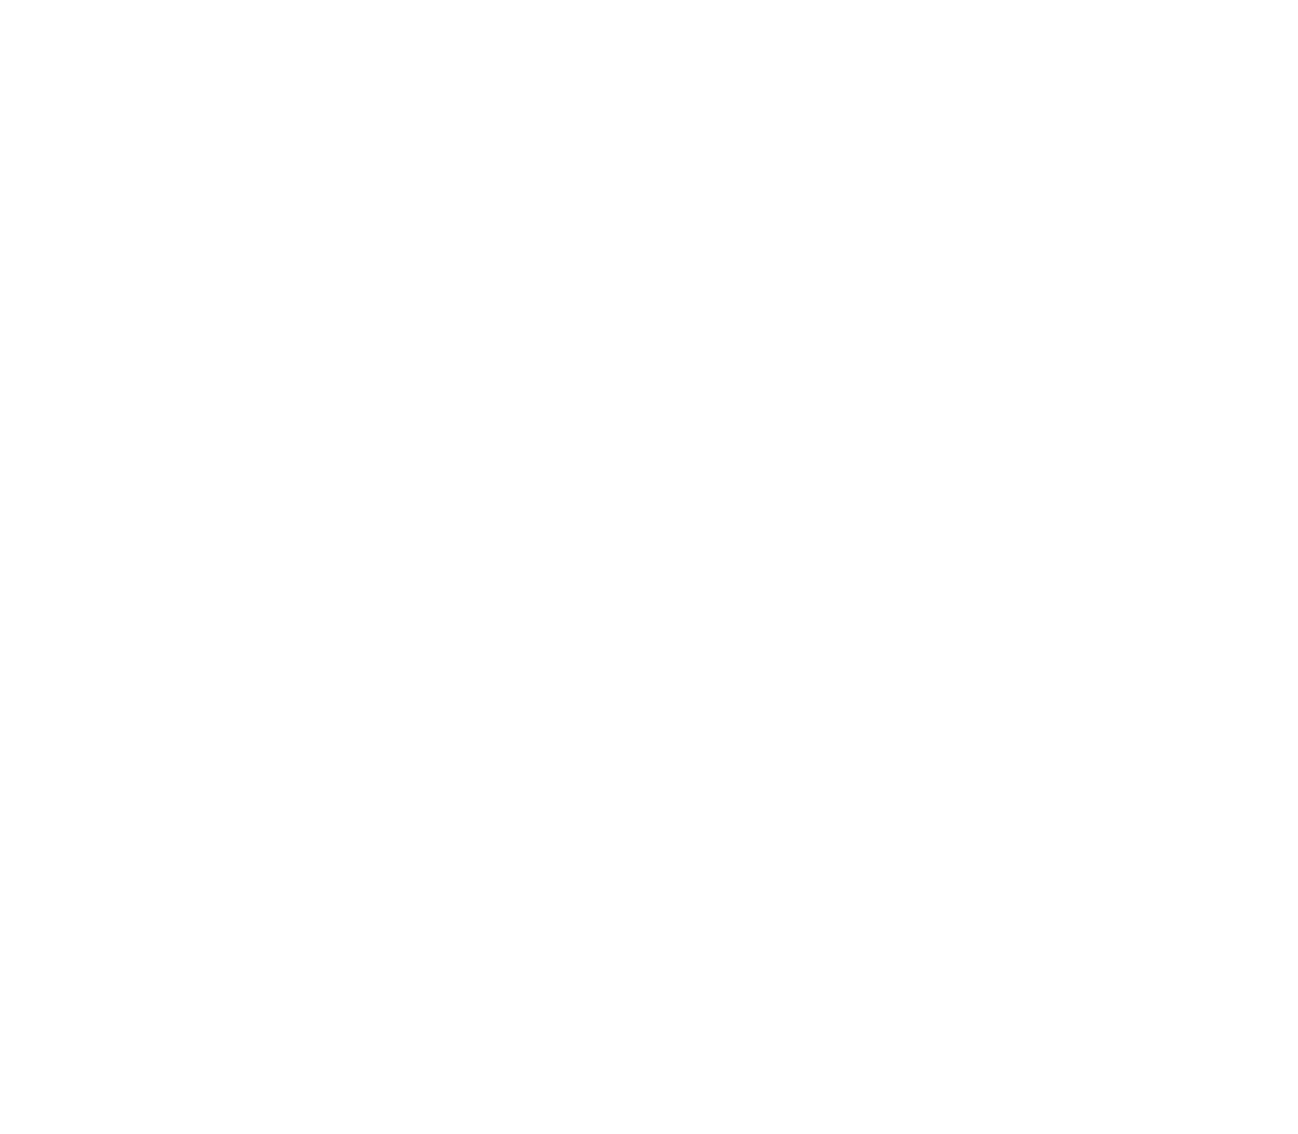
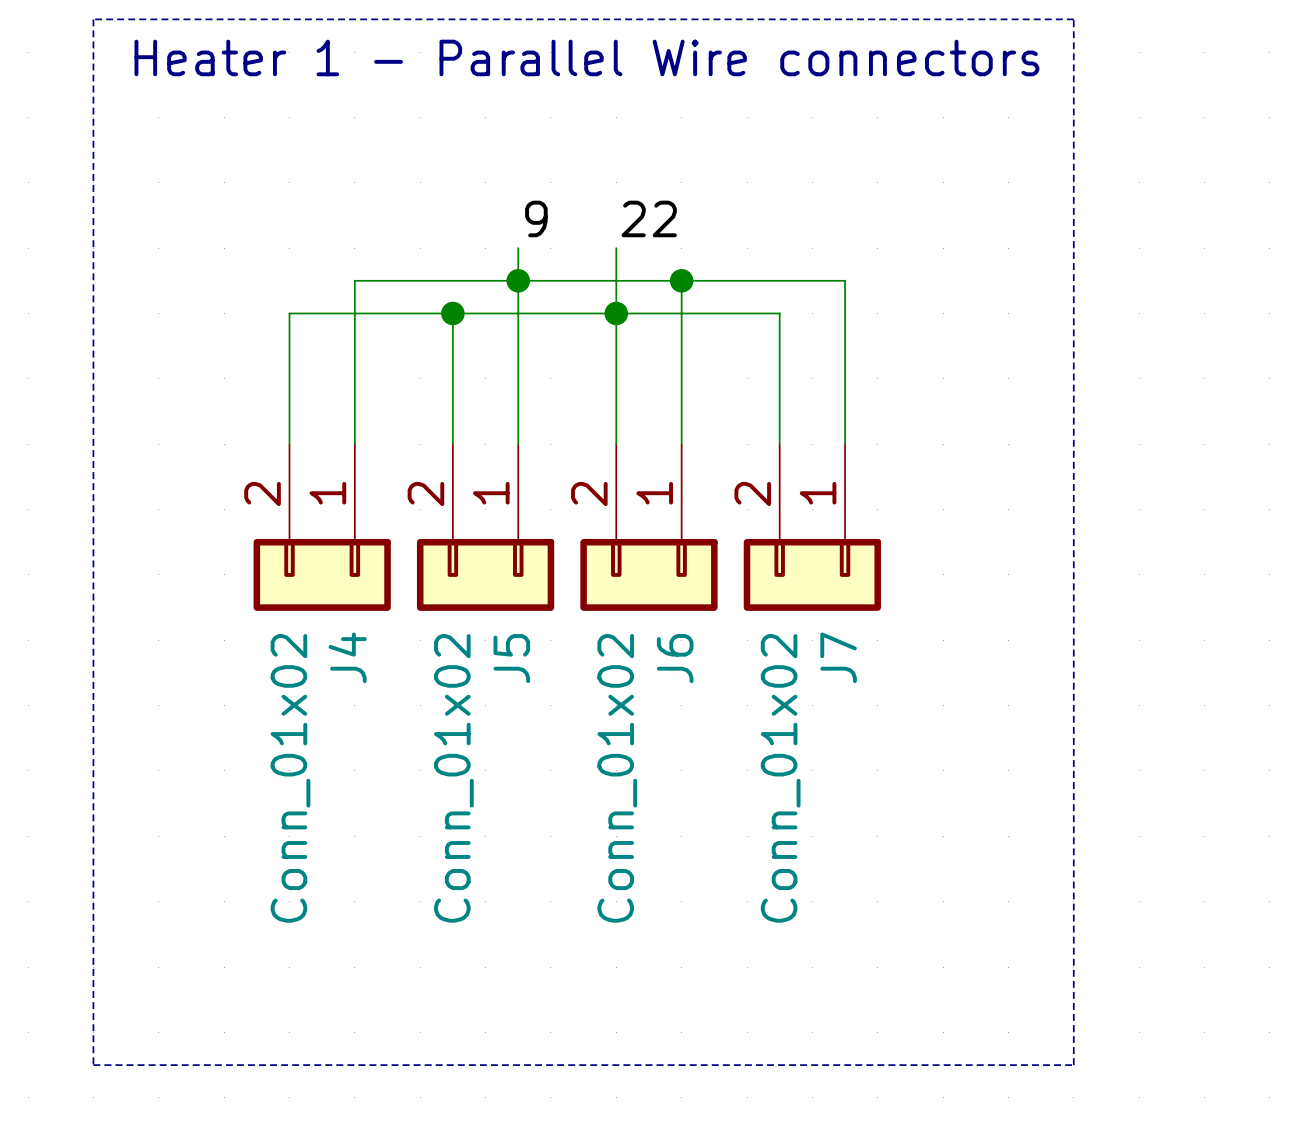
line: none -> (93, 19) (1073, 19) (1073, 1065) (93, 1065) (93, 19)
text: none -> Heater 1 - Parallel Wire connectors (586, 57)
label: none -> 9 (536, 218)
label: none -> 22 (649, 218)
wire: none -> (518, 248) (518, 444)
wire: none -> (616, 248) (616, 444)
junction: none -> (518, 280)
wire: none -> (681, 280) (681, 444)
junction: none -> (681, 280)
wire: none -> (452, 313) (452, 444)
junction: none -> (452, 313)
junction: none -> (616, 313)
wire: none -> (289, 444) (289, 313) (779, 313) (779, 444)
wire: none -> (354, 444) (354, 280) (845, 280) (845, 444)
J4: none -> Conn_01x02 (322, 527)
J5: none -> Conn_01x02 (485, 527)
J6: none -> Conn_01x02 (648, 527)
J7: none -> Conn_01x02 (812, 527)

